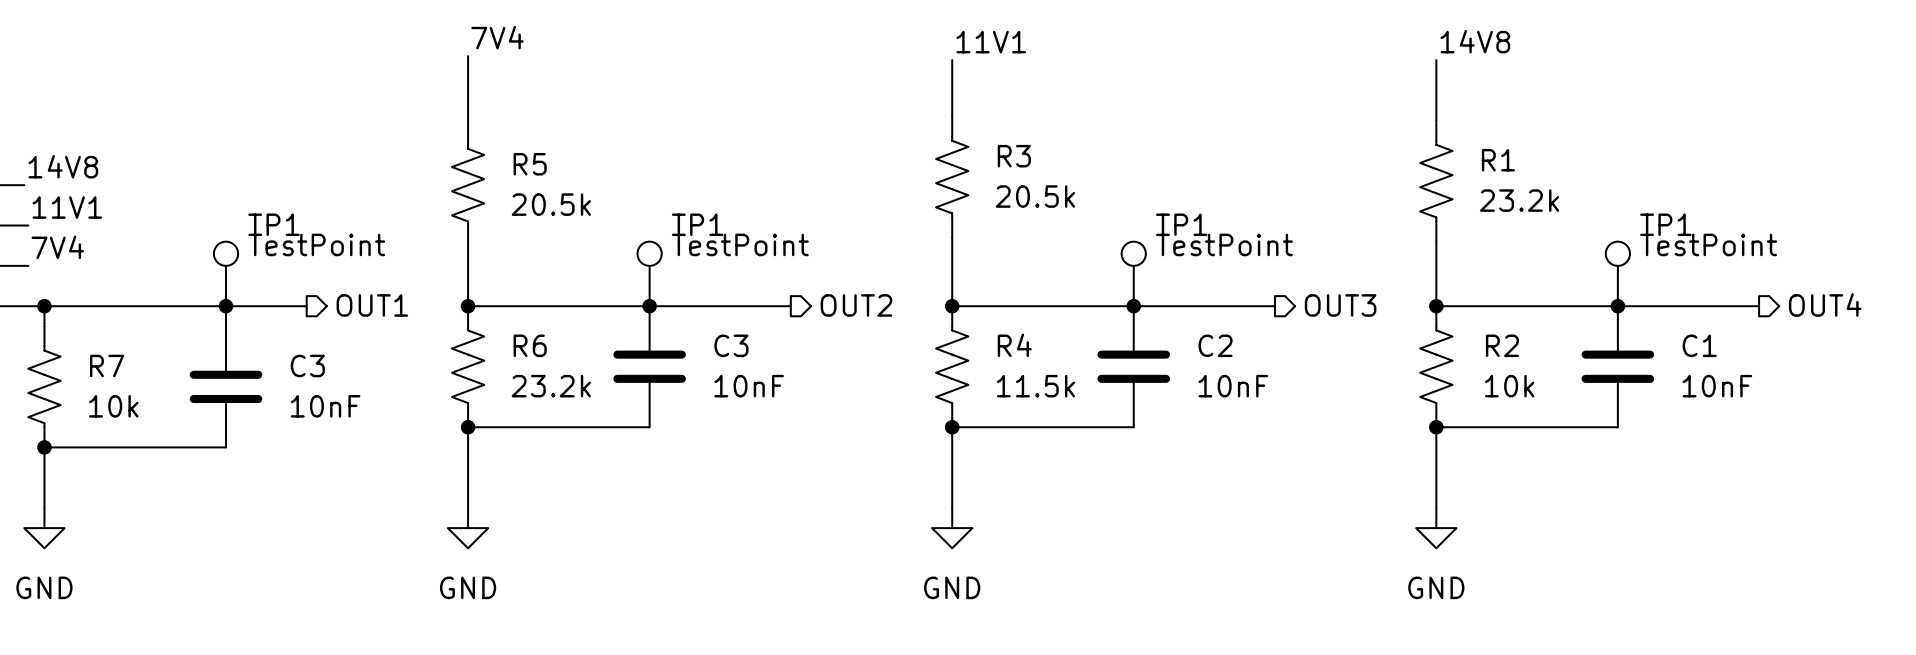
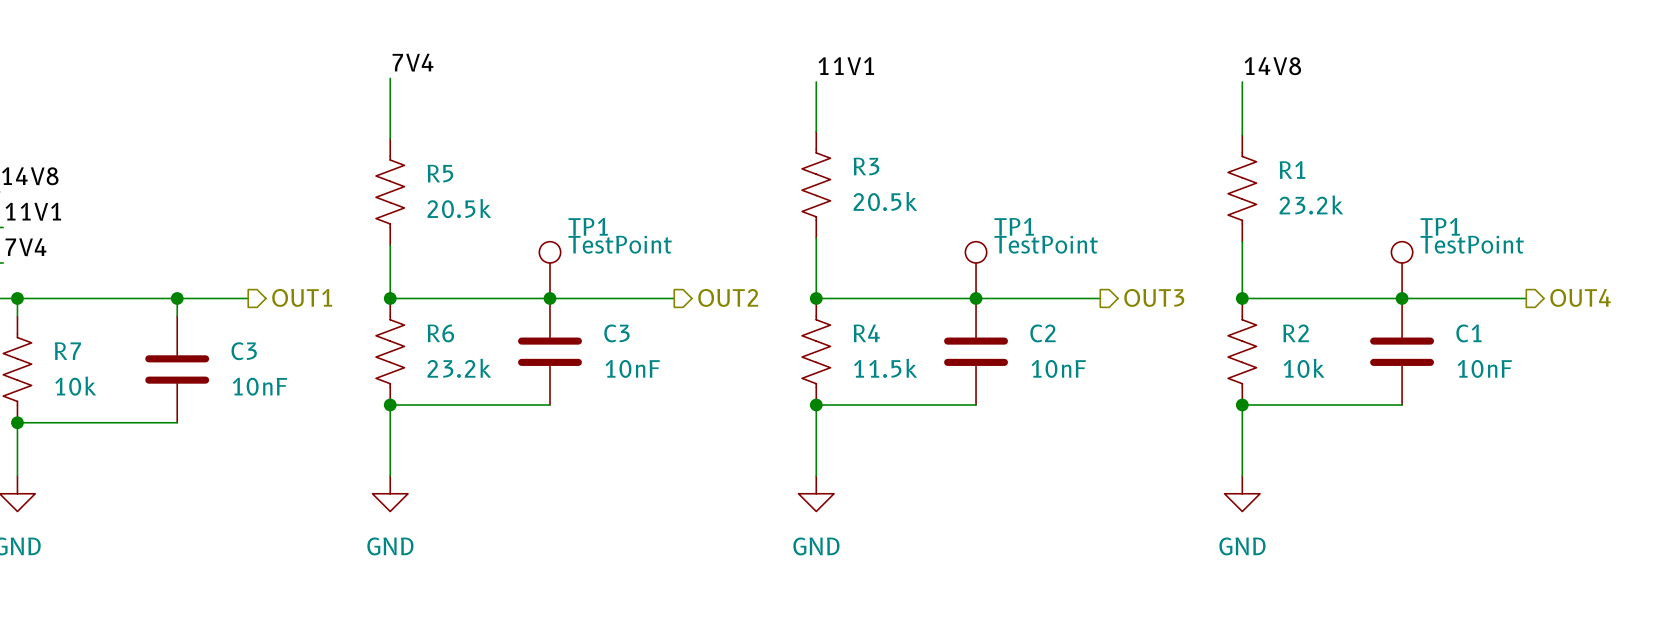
TP1: TestPoint (226, 273) -> none

